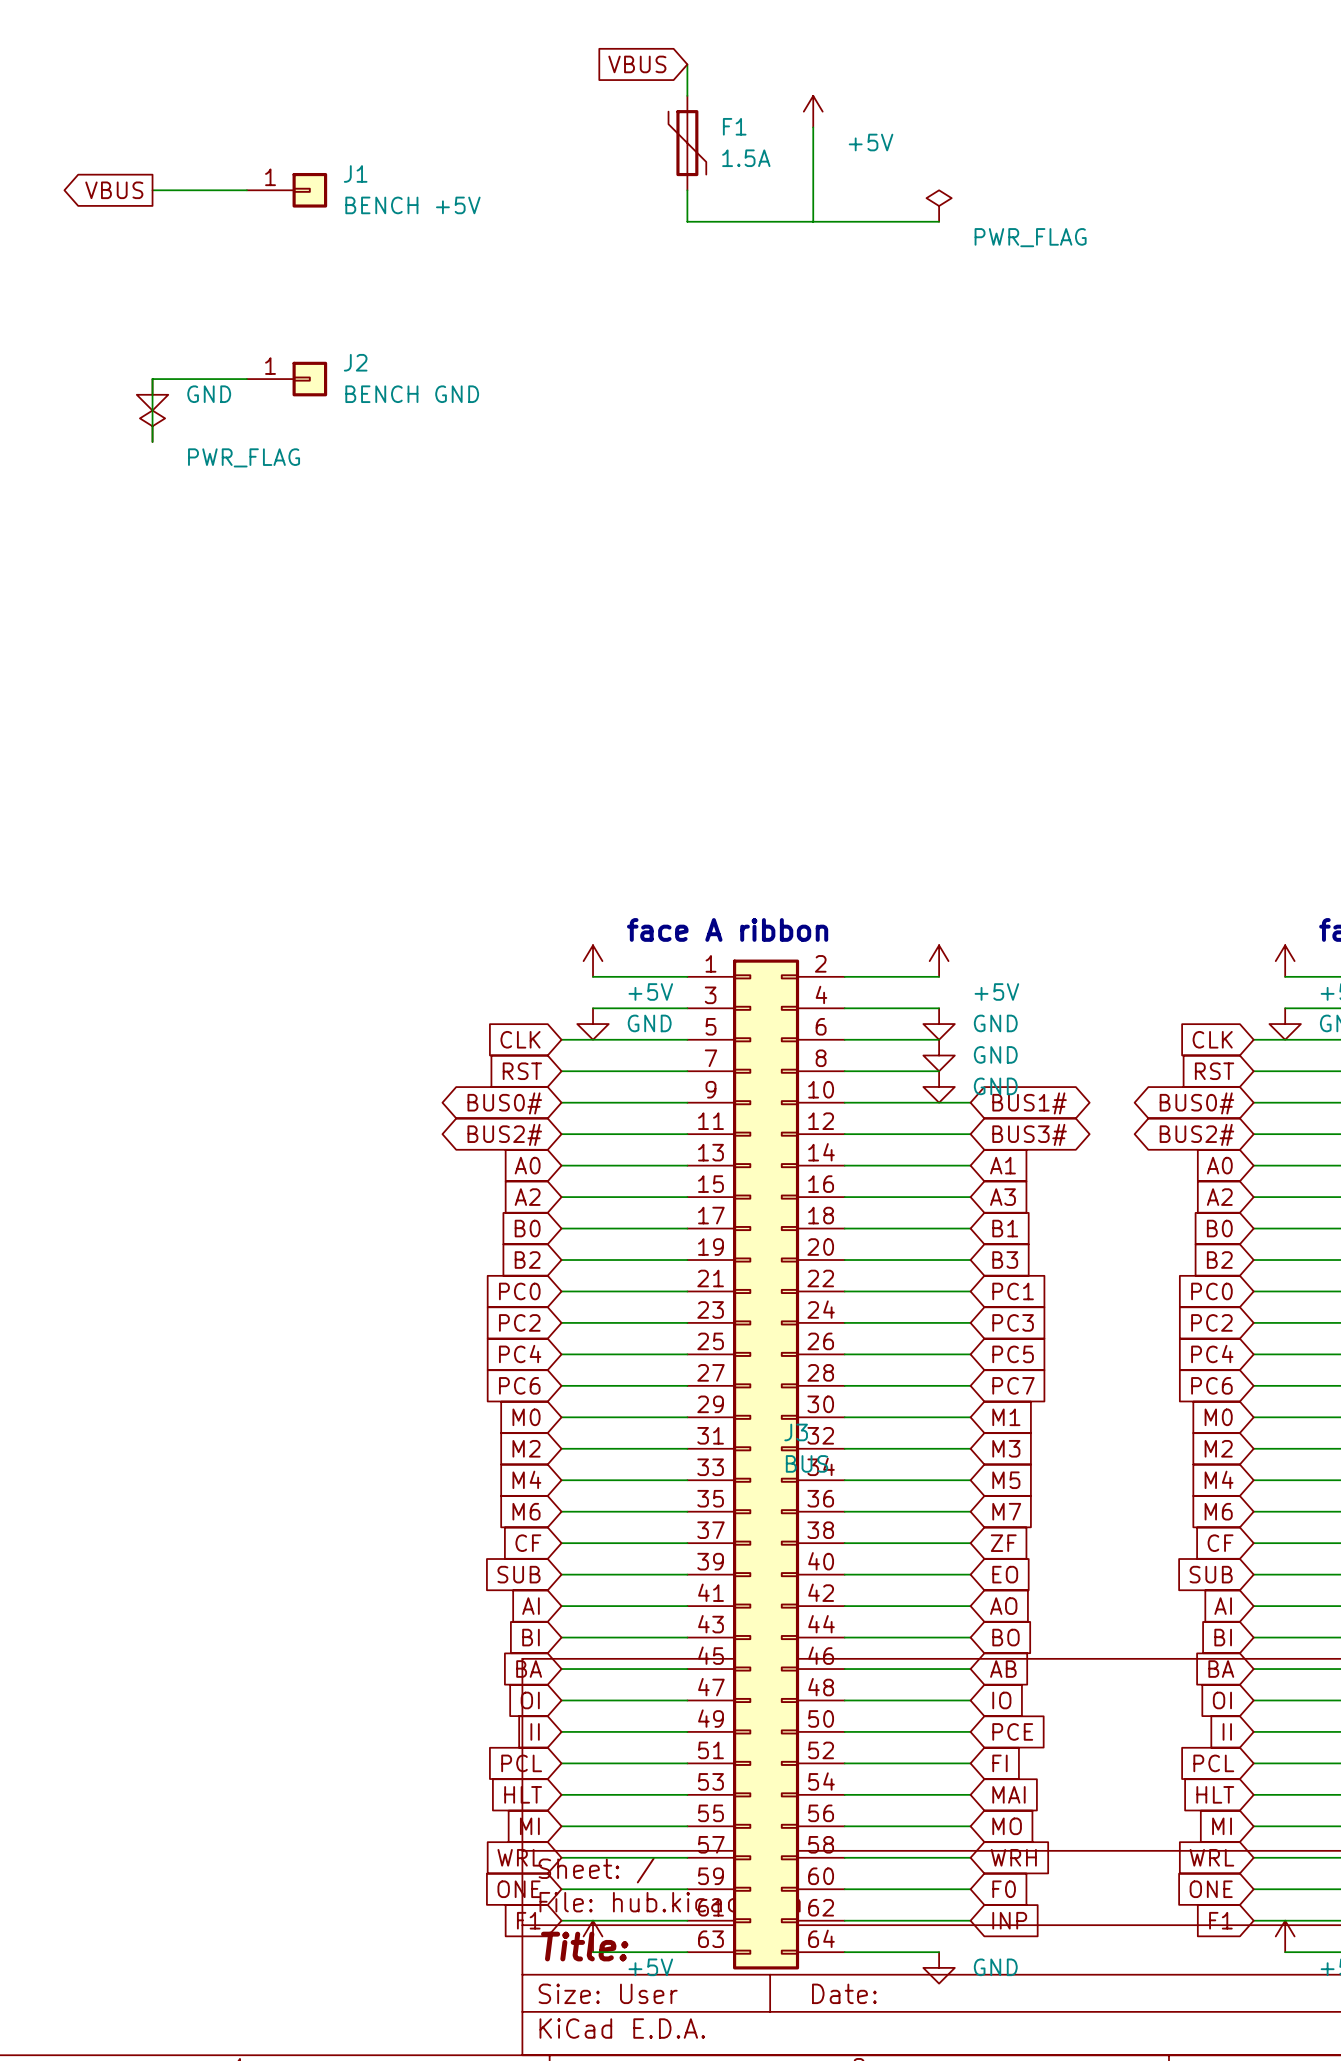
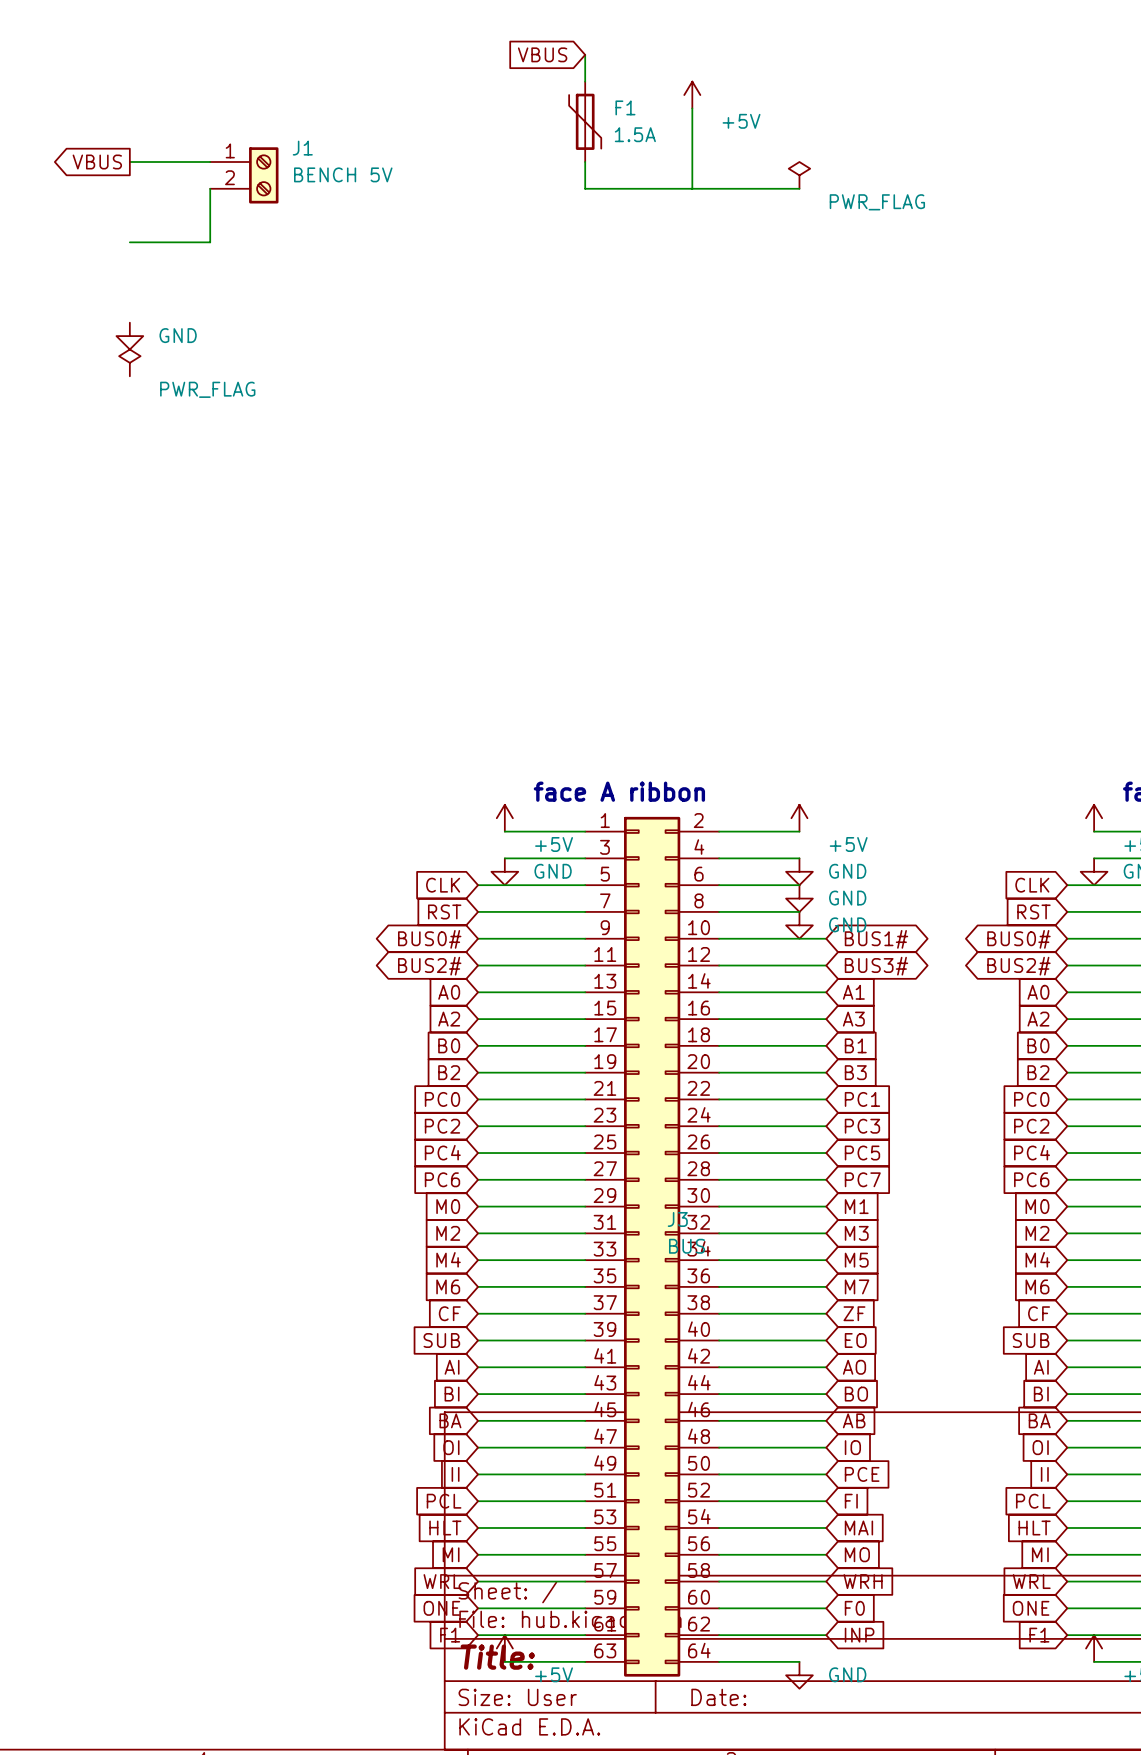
J1 symbol: [246, 172, 328, 208] -> [210, 147, 279, 204]
J1 value: BENCH +5V (412, 205) -> BENCH 5V (343, 174)
wire: none -> (210, 188) (210, 242) (129, 242)
wire: (246, 379) (152, 379) (152, 441) -> none
J2: BENCH GND (287, 379) -> none

